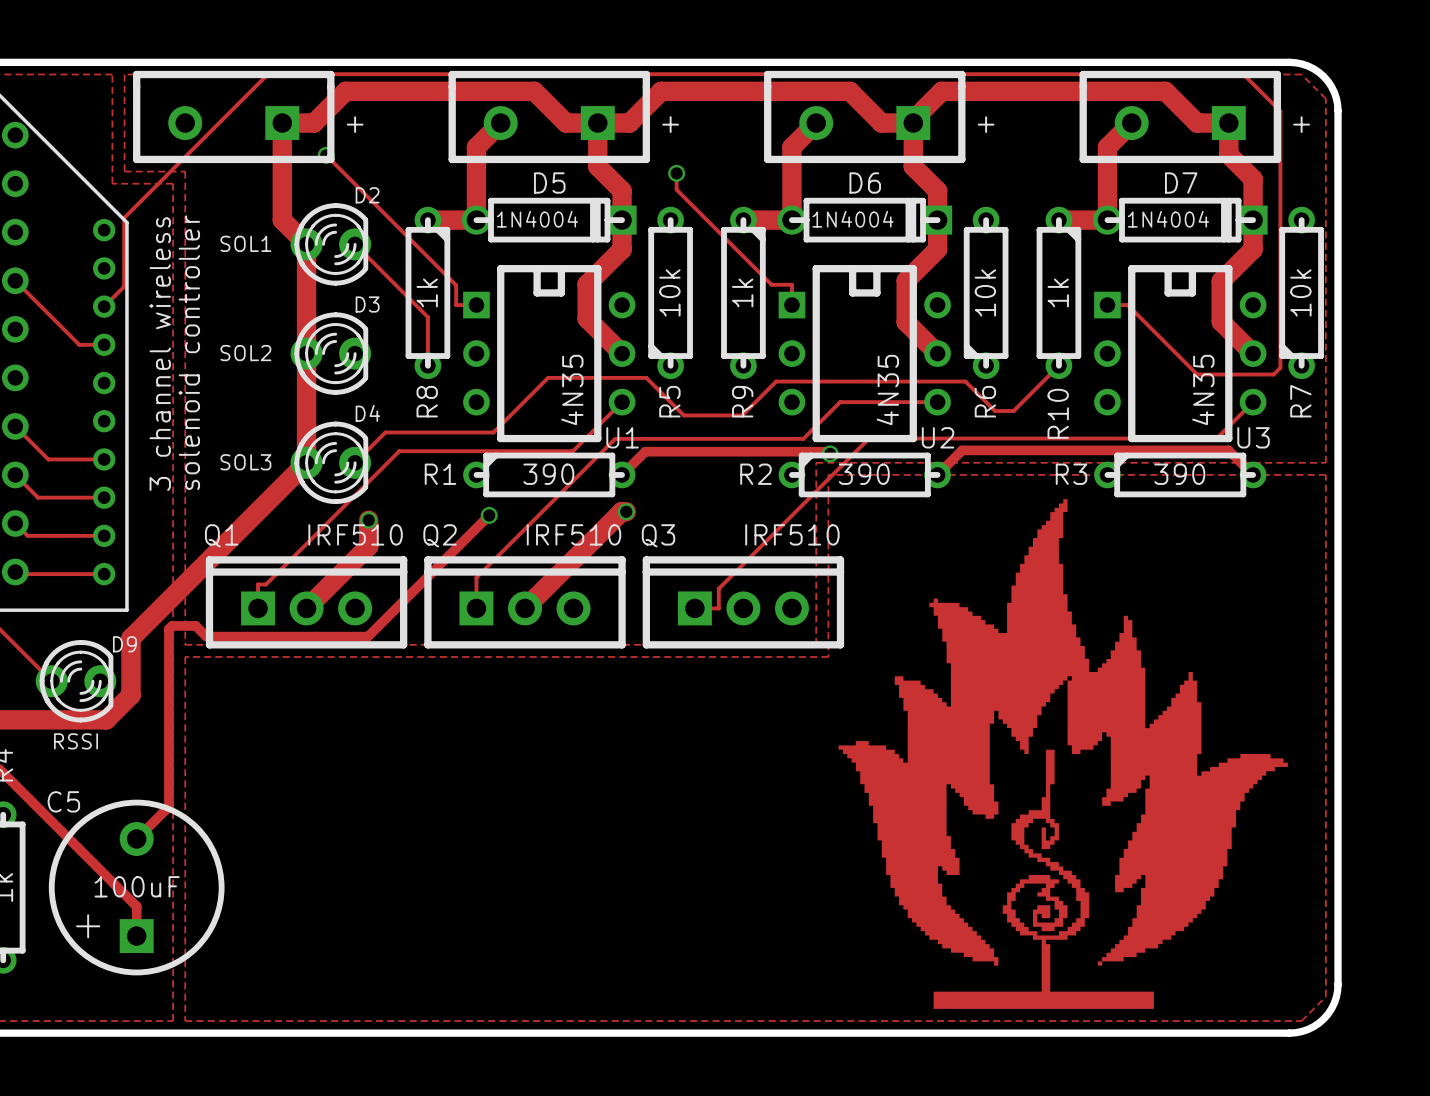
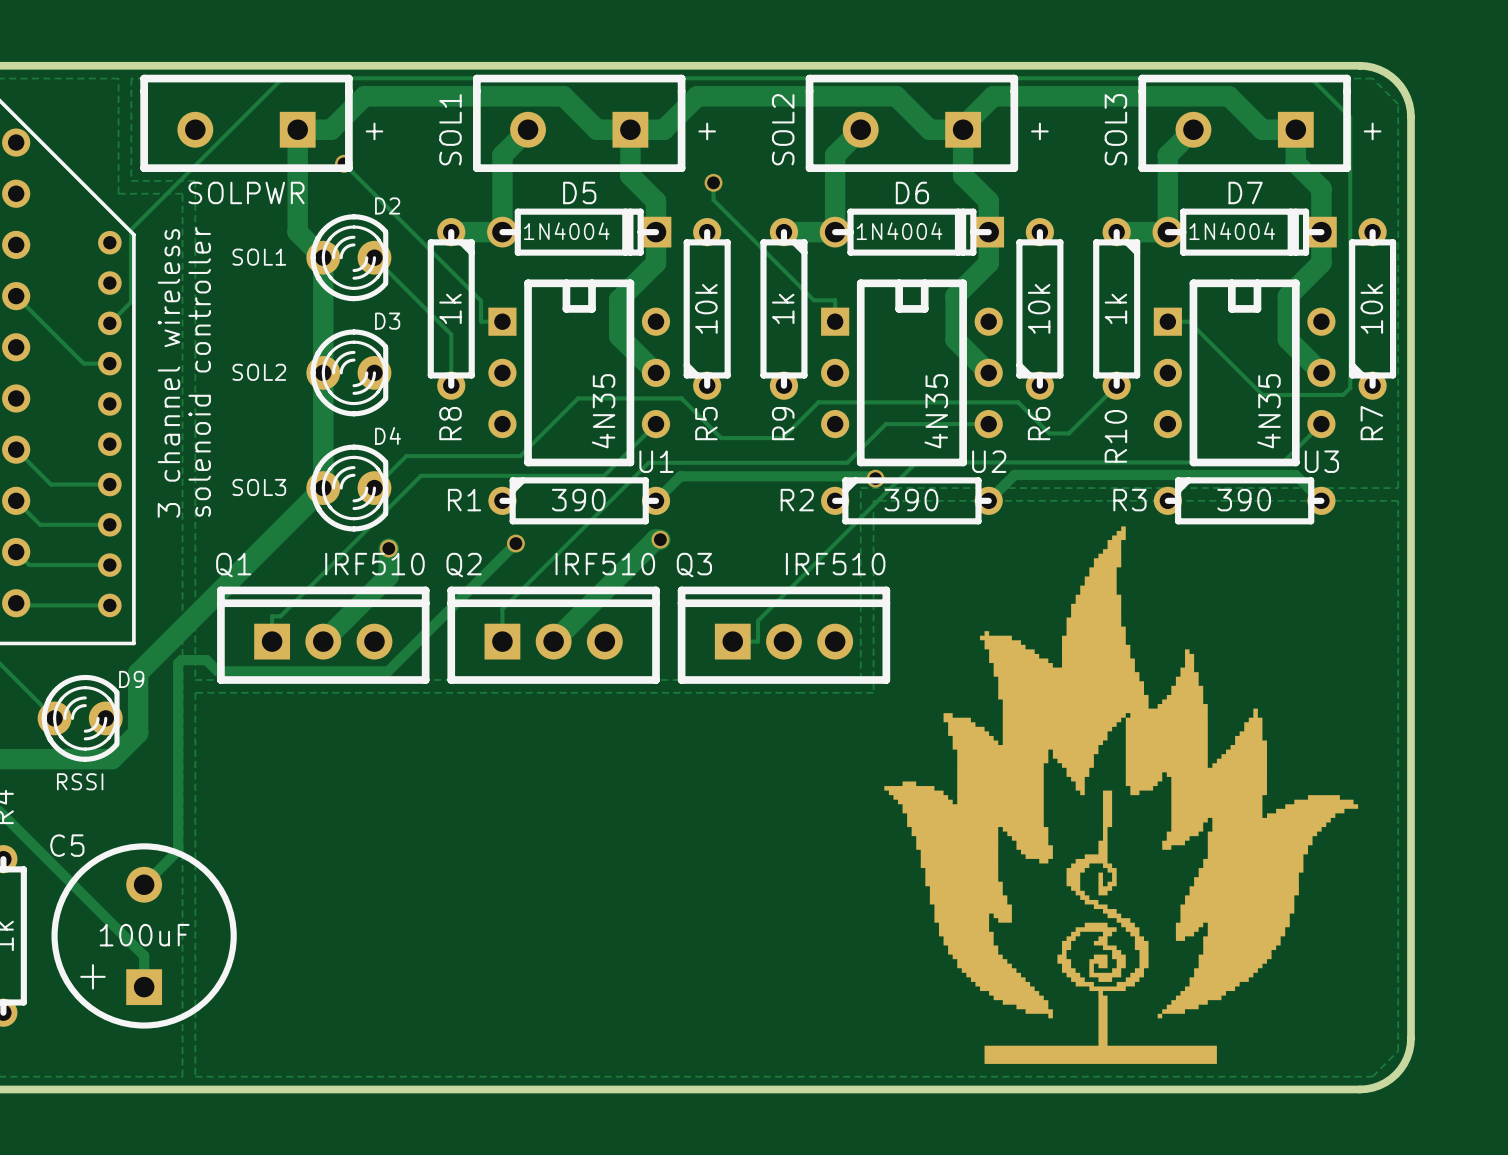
part value: none -> SOL1 (450, 129)
part value: none -> SOL2 (783, 129)
part value: none -> SOL3 (1115, 129)
part value: none -> SOLPWR (246, 192)

